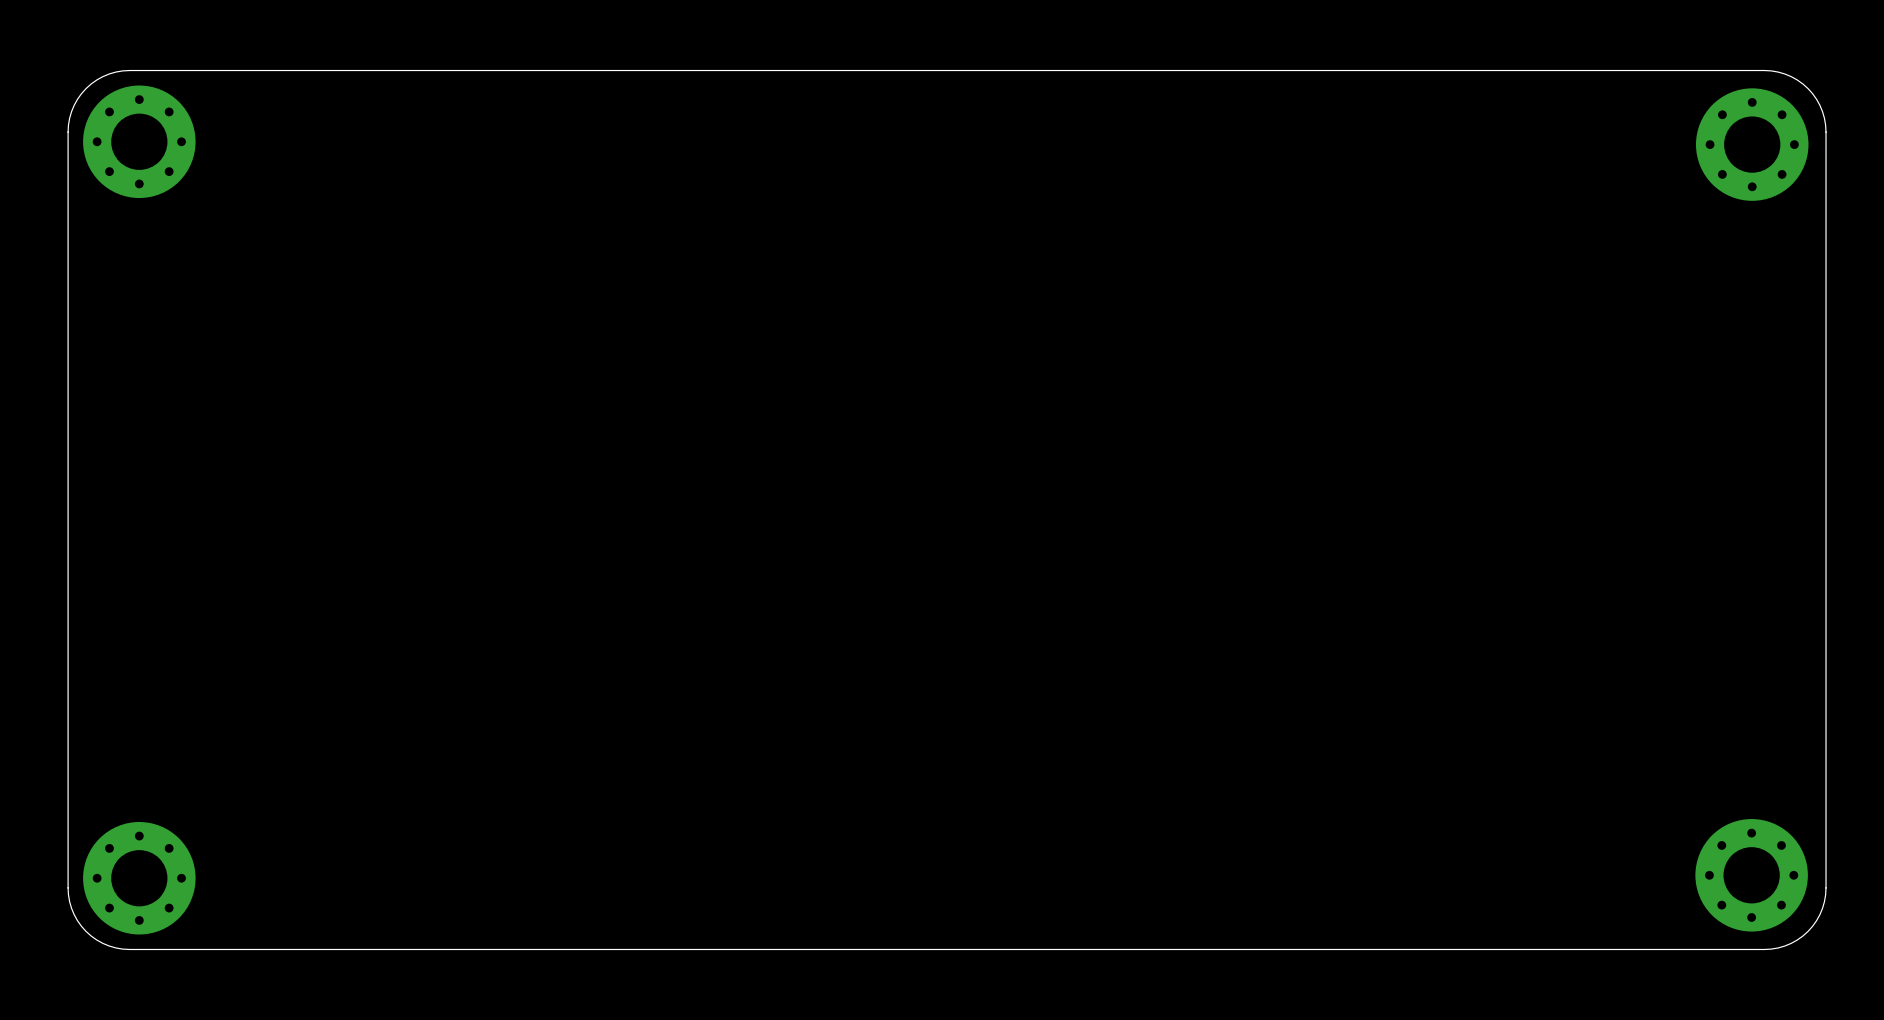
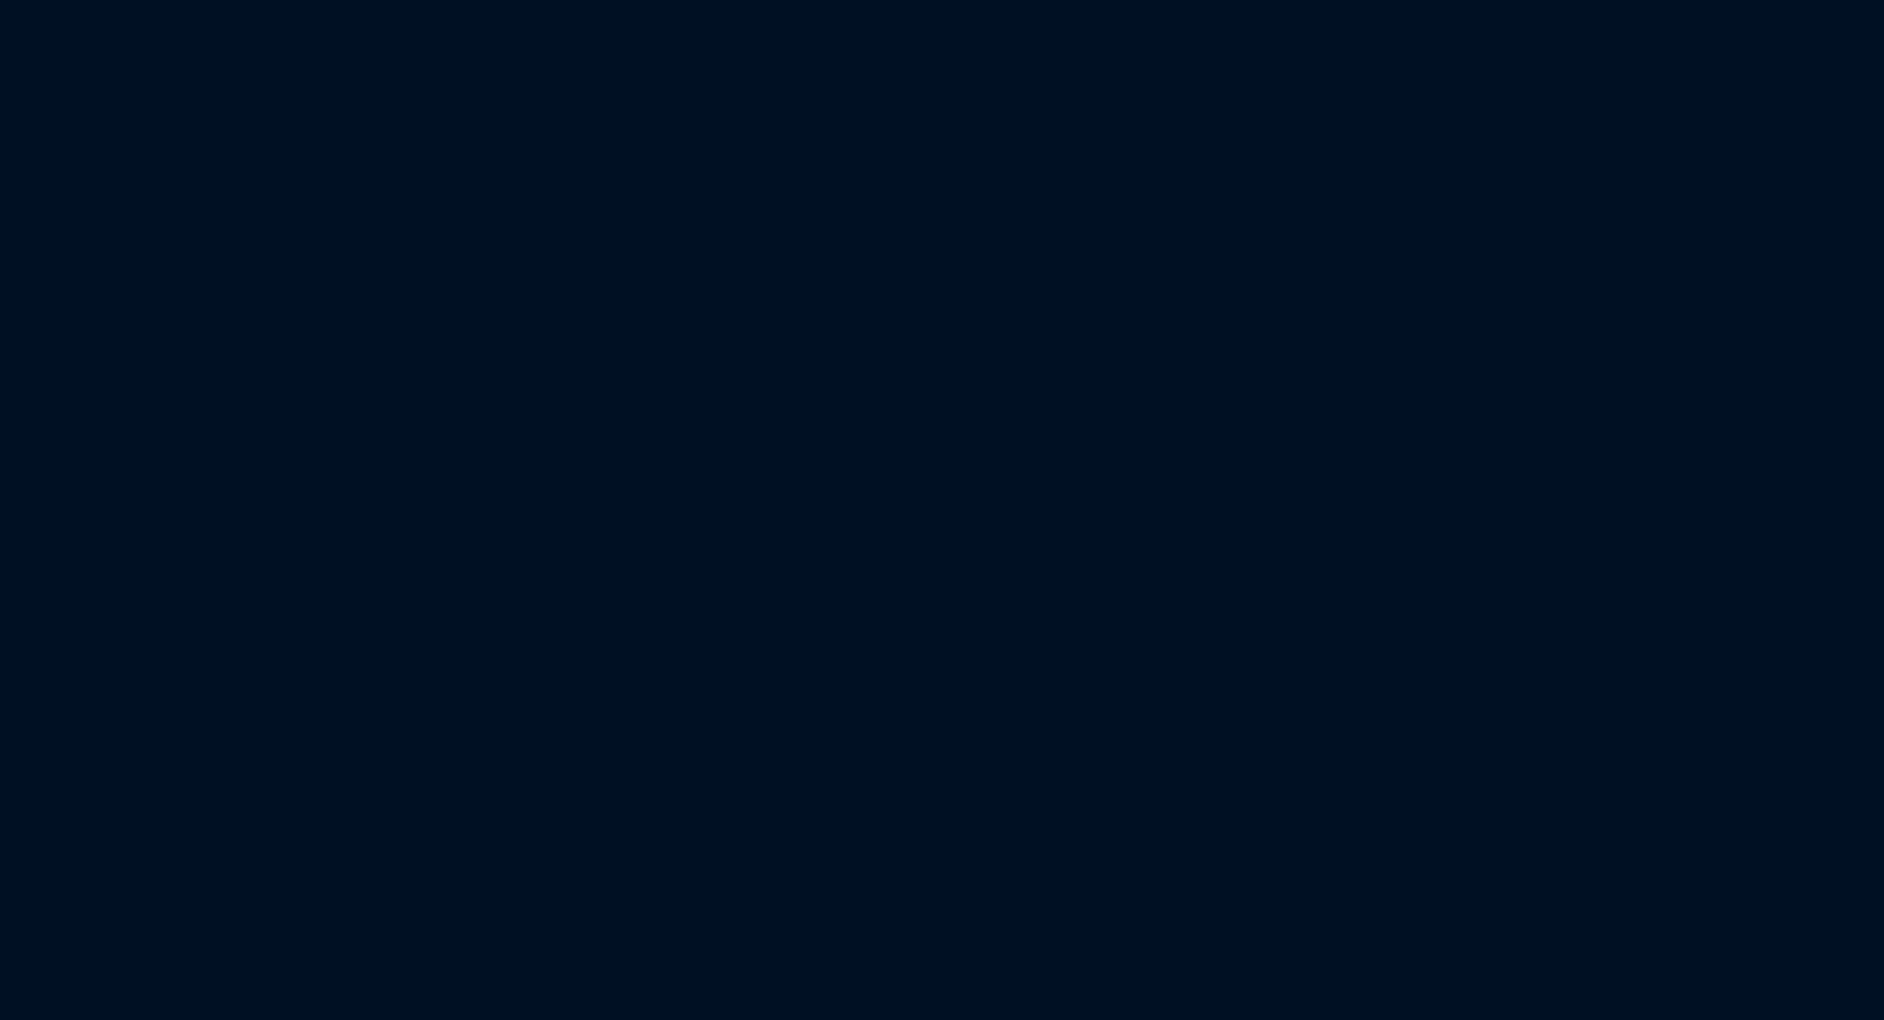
board edge: (129, 70) (1764, 70) (1778, 72) (1791, 76) (1802, 83) (1816, 99) (1824, 118) (1826, 132) (1826, 887) (1824, 901) (1819, 914) (1807, 931) (1797, 940) (1778, 947) (1764, 949) (129, 949) (115, 947) (102, 943) (91, 936) (77, 920) (71, 908) (68, 887) (68, 132) (69, 118) (74, 105) (86, 88) (102, 76) (115, 72) (129, 70) -> none
part: (139, 141) -> none
part: (1752, 144) -> none
part: (1751, 875) -> none
part: (139, 878) -> none

